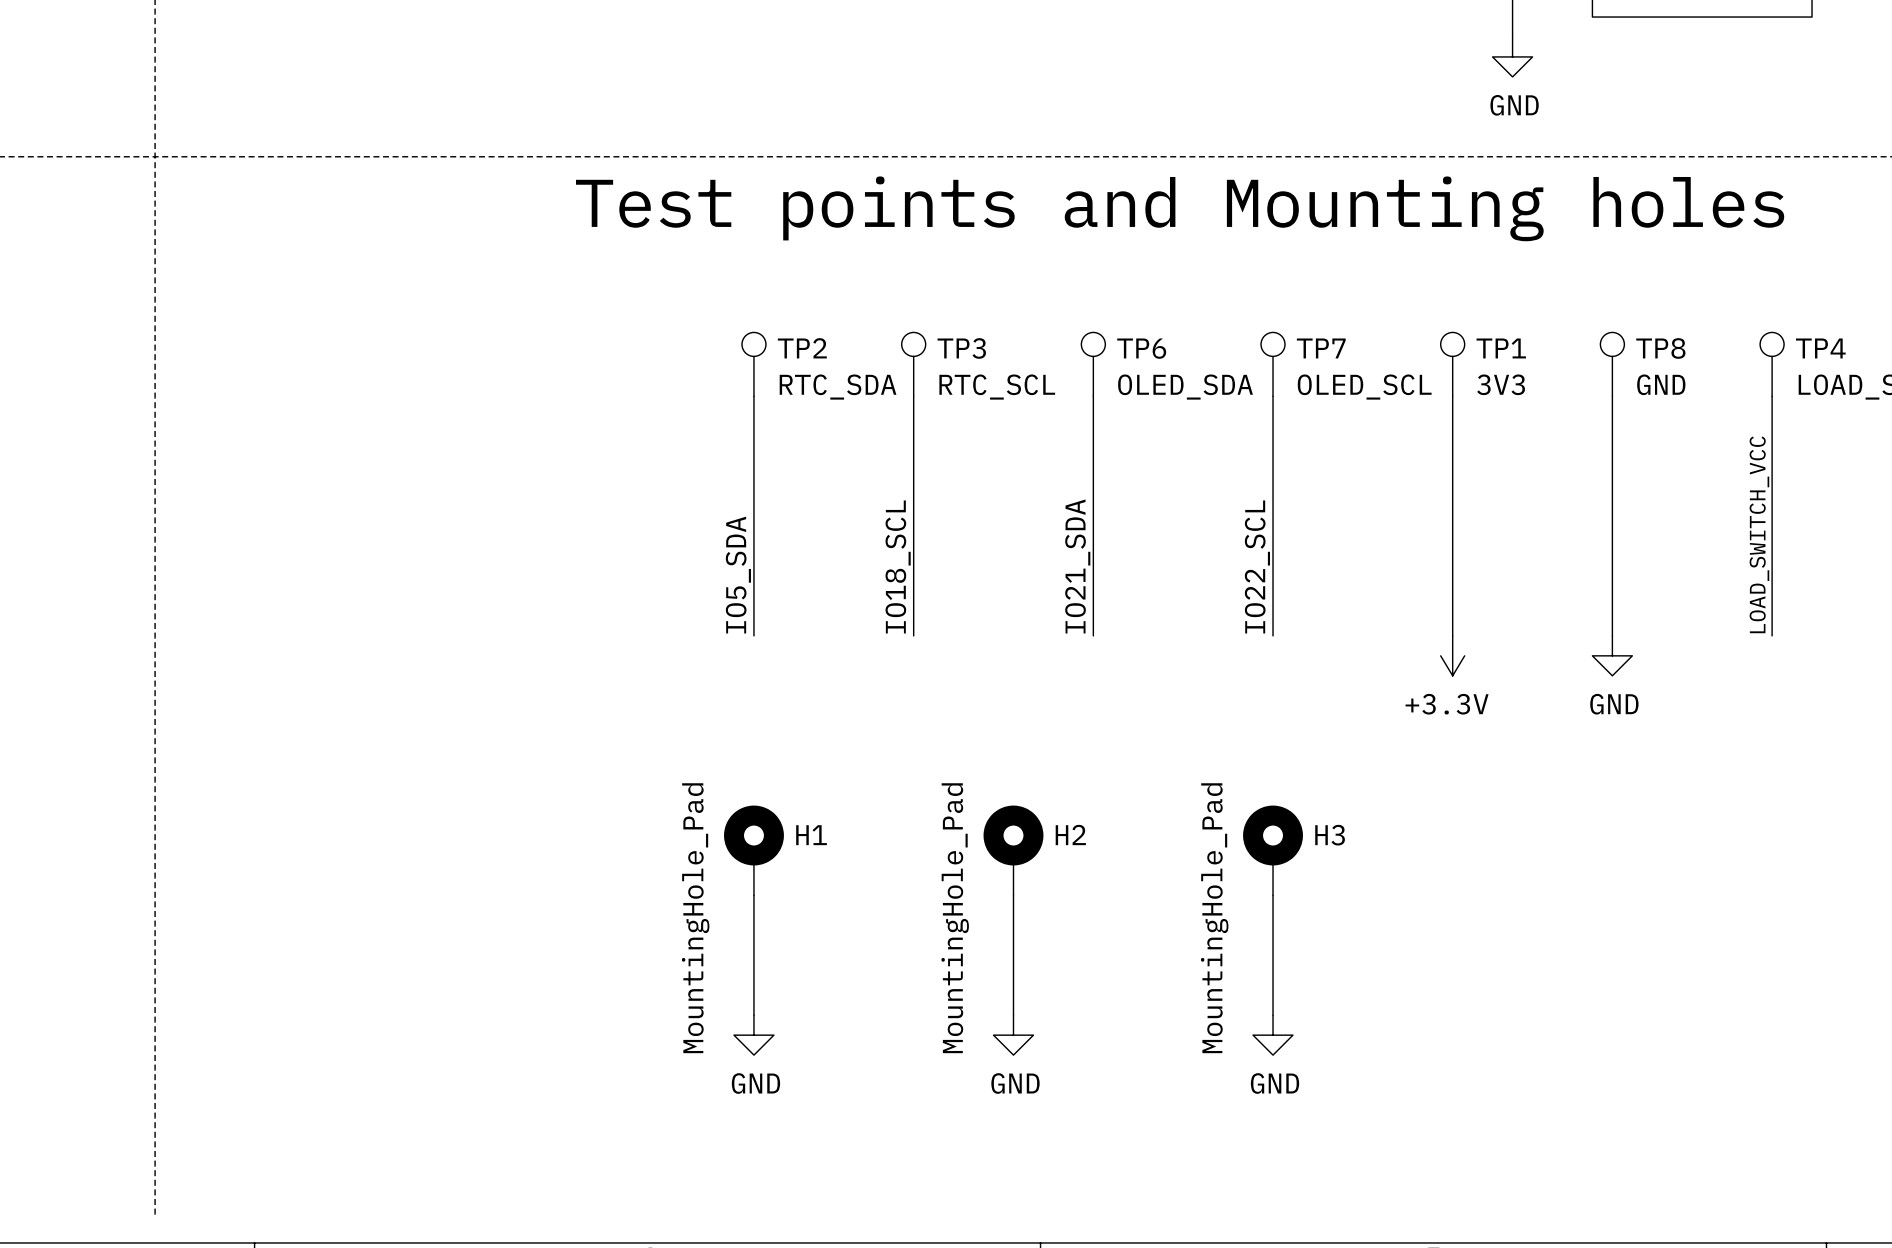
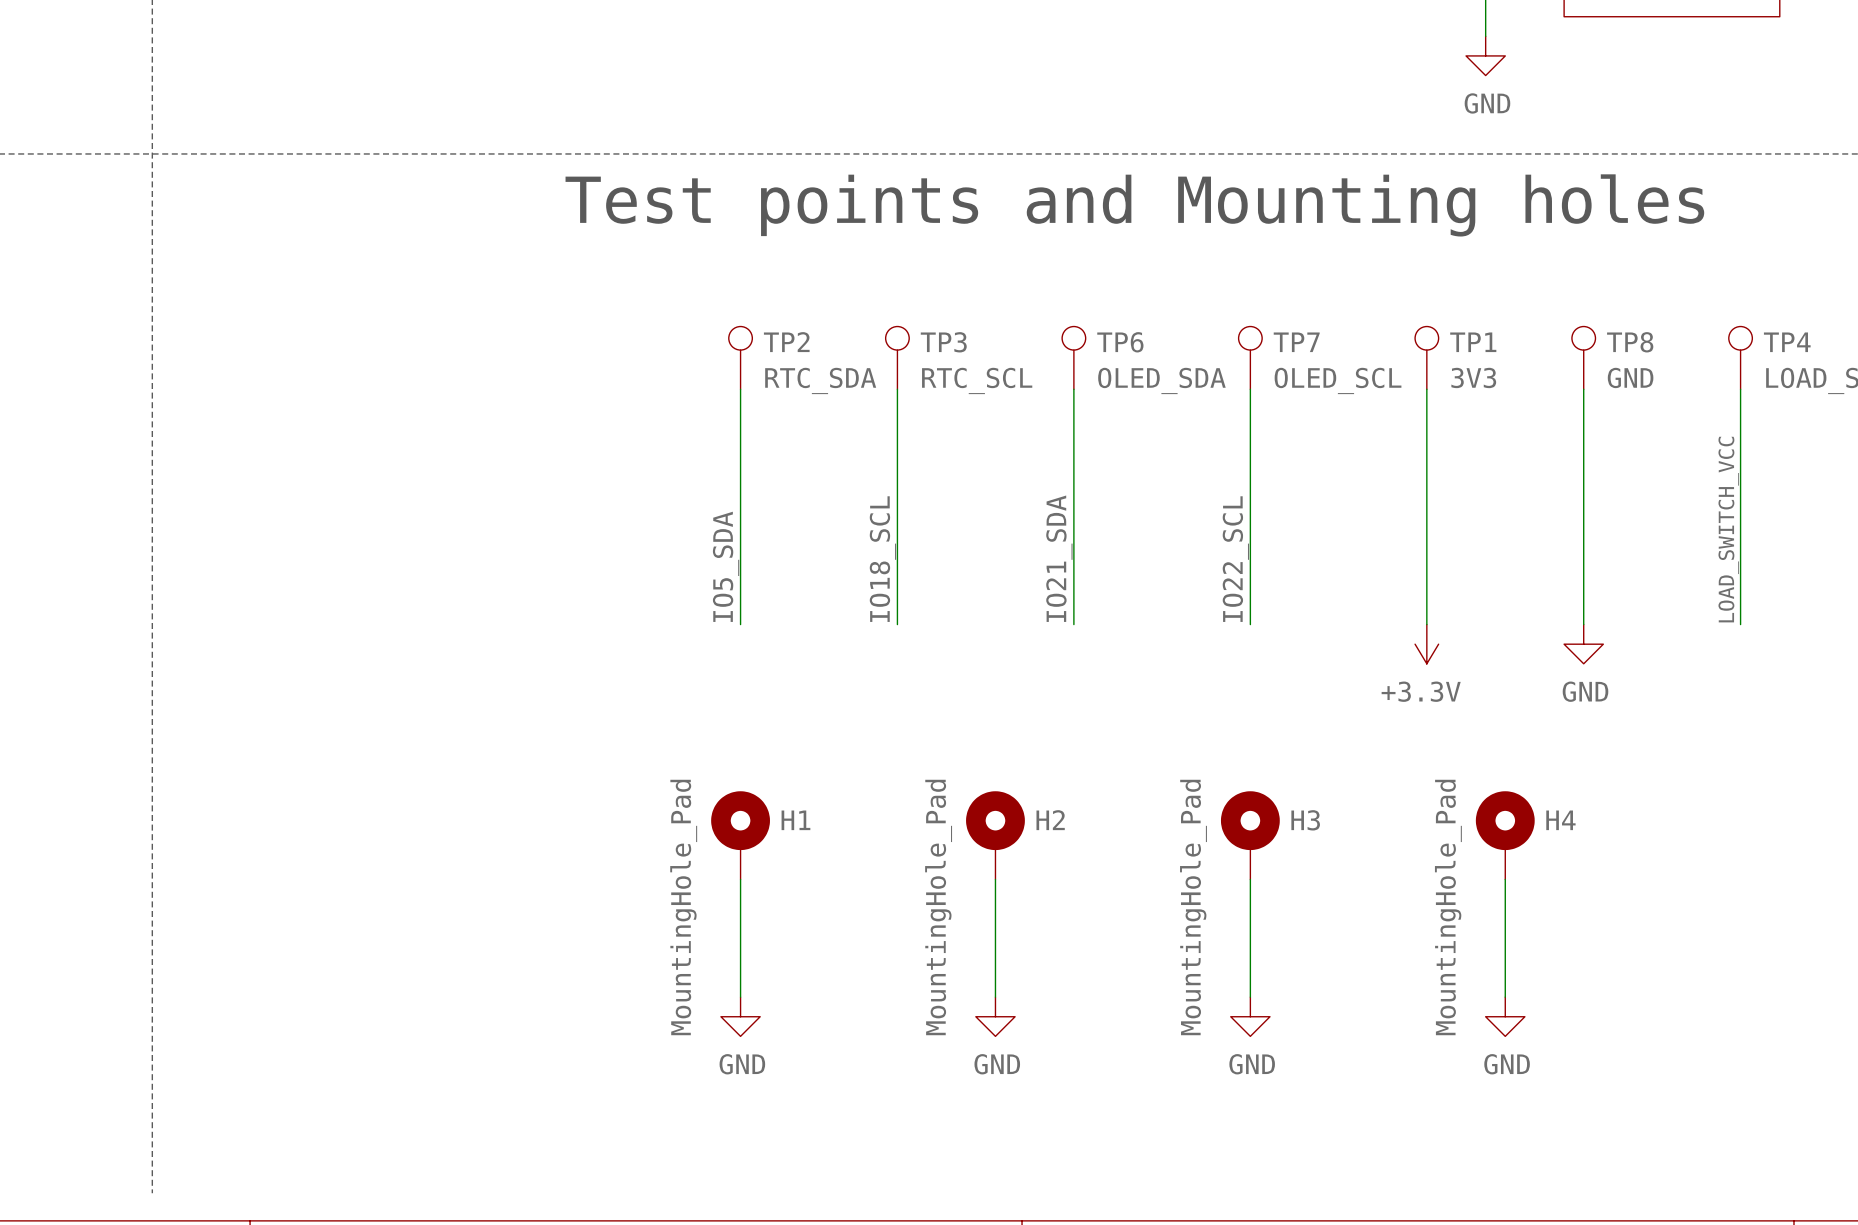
H4: none -> MountingHole_Pad (1505, 835)
wire: none -> (1505, 879) (1505, 997)
power symbol: none -> GND (1505, 1016)

